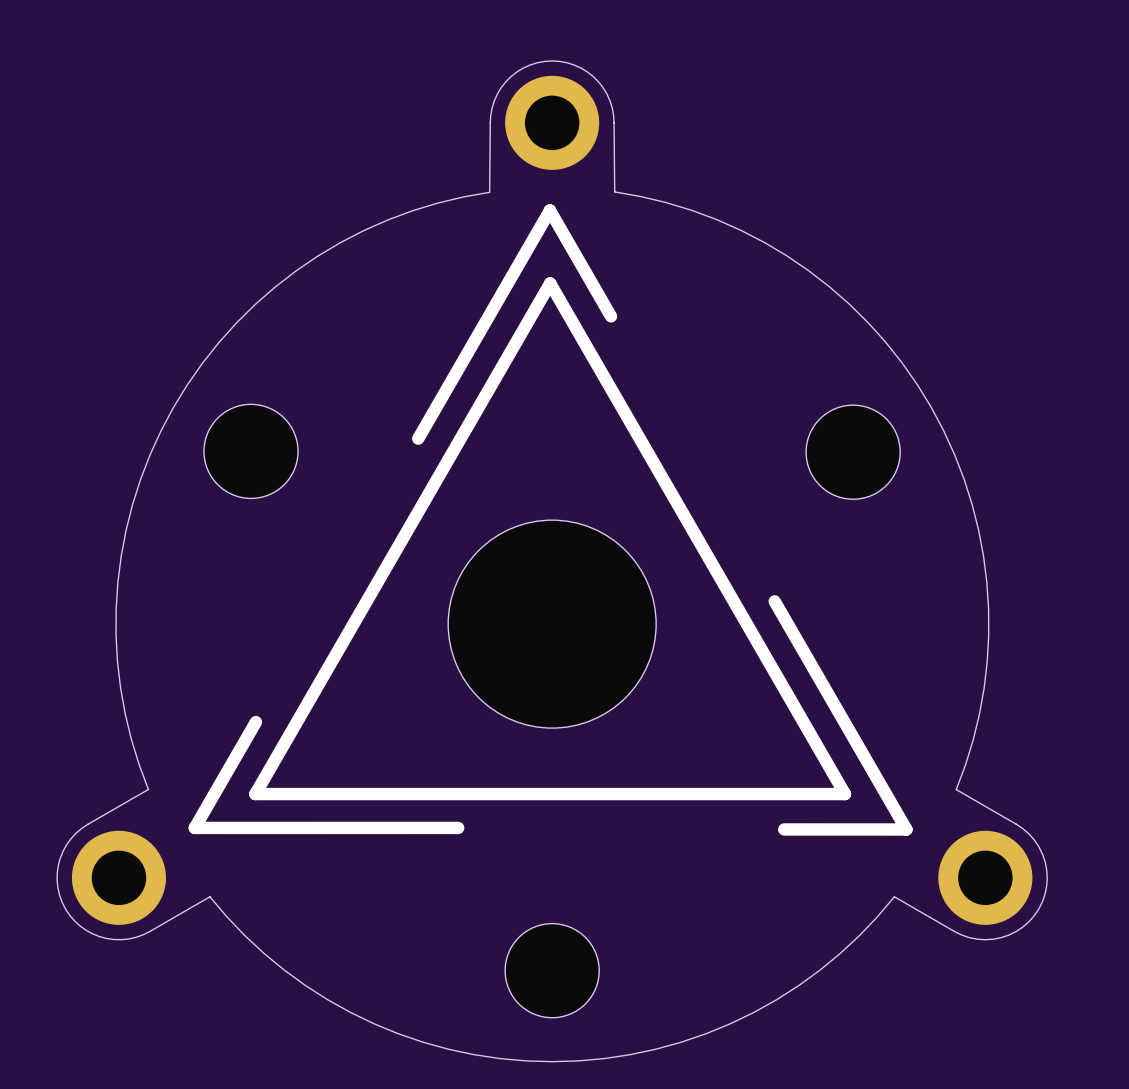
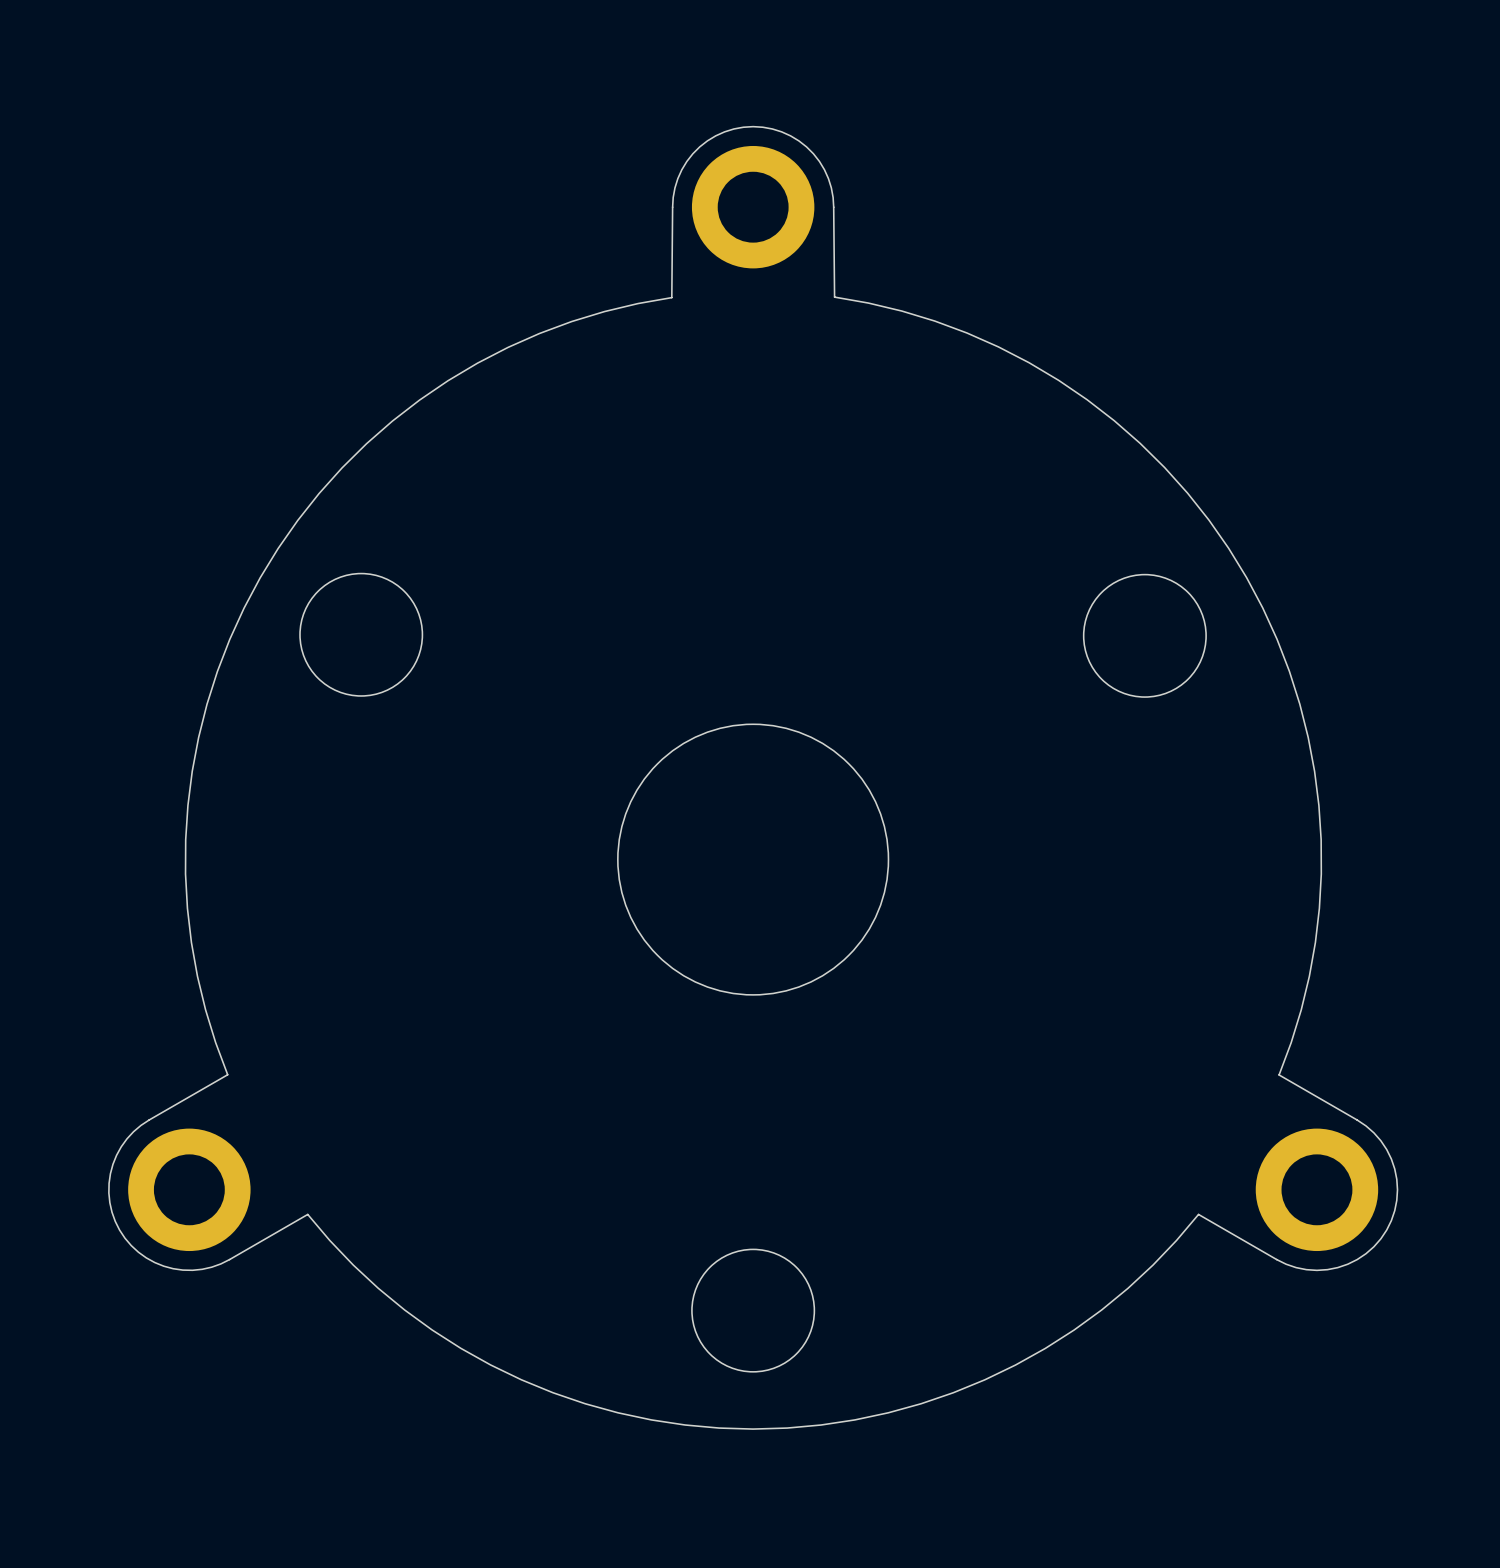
drawing: [188, 204, 913, 836] -> none

